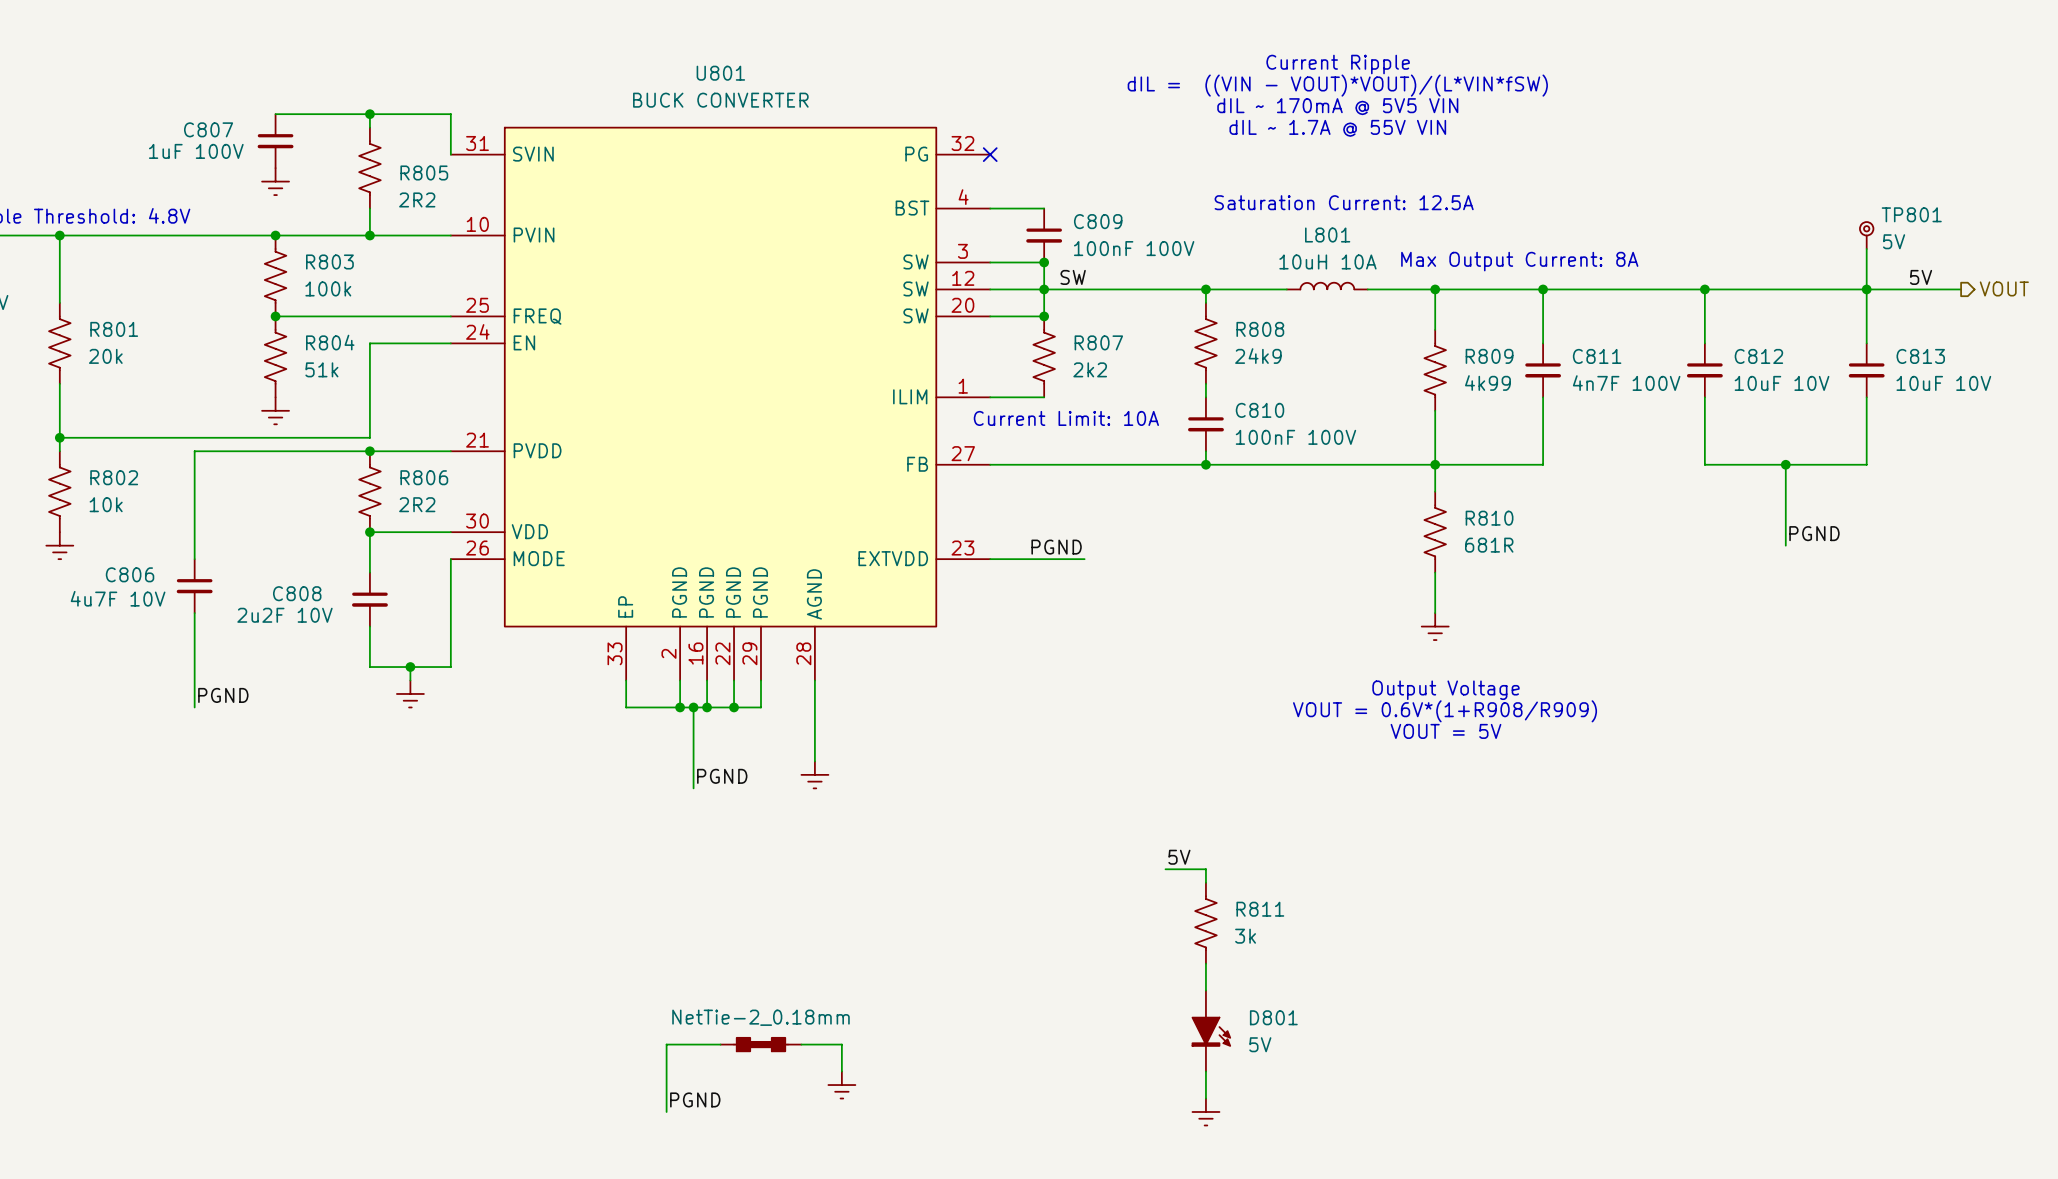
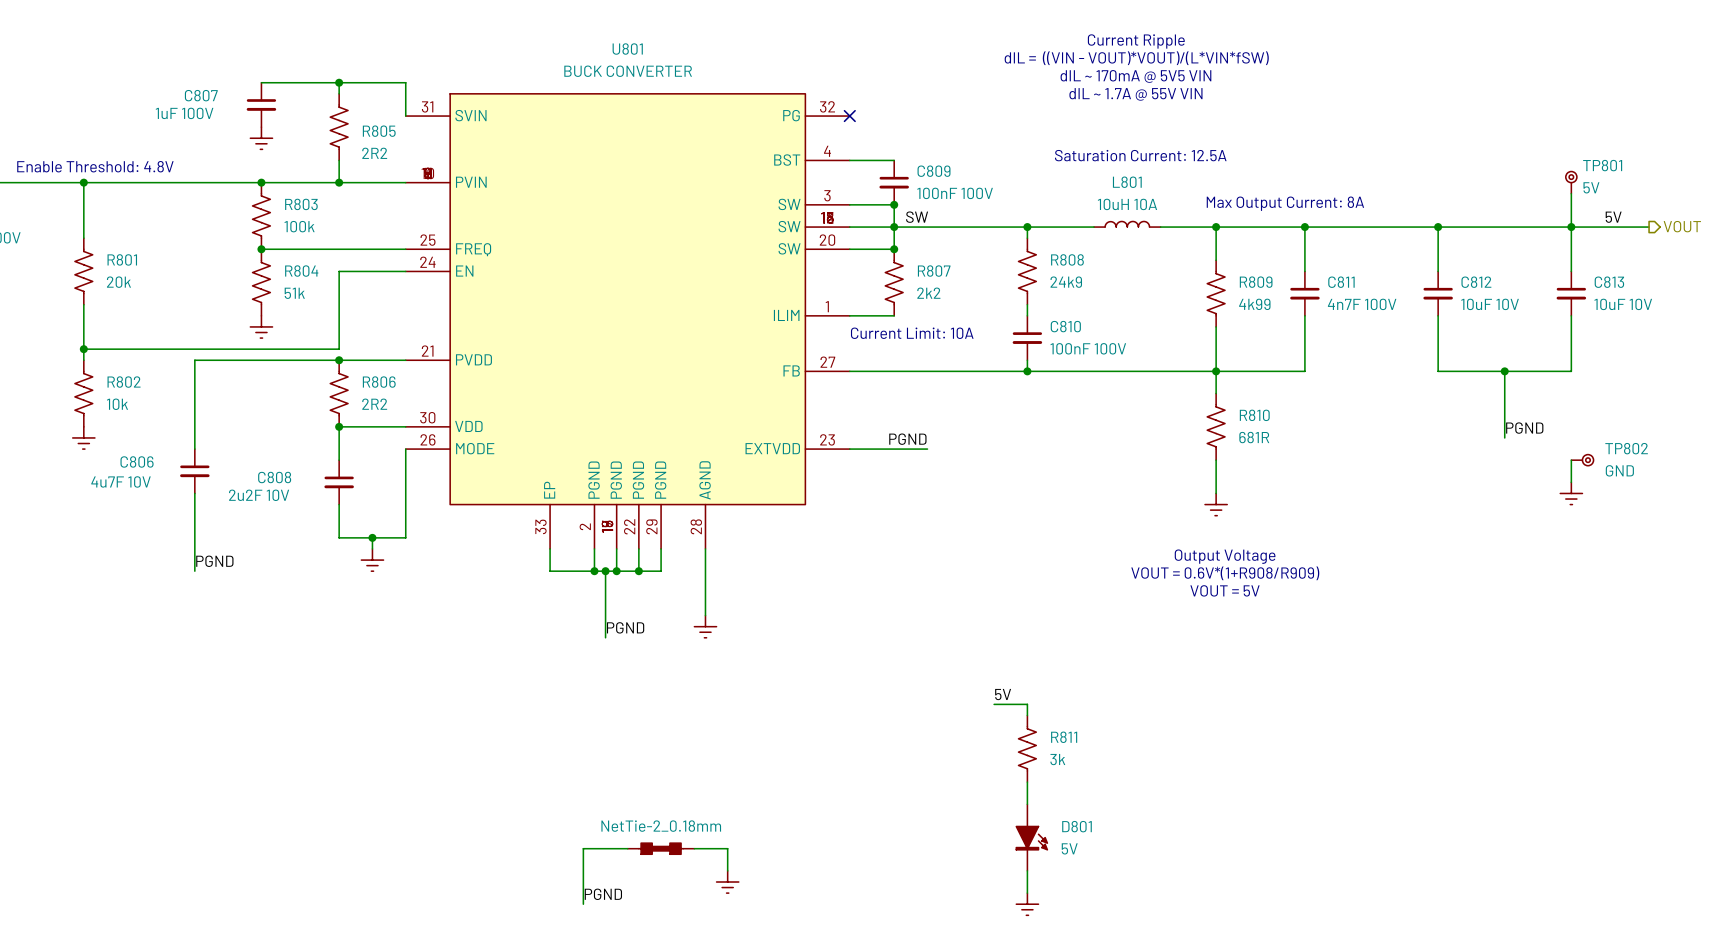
U801 symbol: [450, 127, 991, 681] -> [405, 93, 850, 549]
wire: none -> (1571, 460) (1571, 482)
TP802: none -> GND (1582, 460)
power symbol: none -> (1571, 493)

